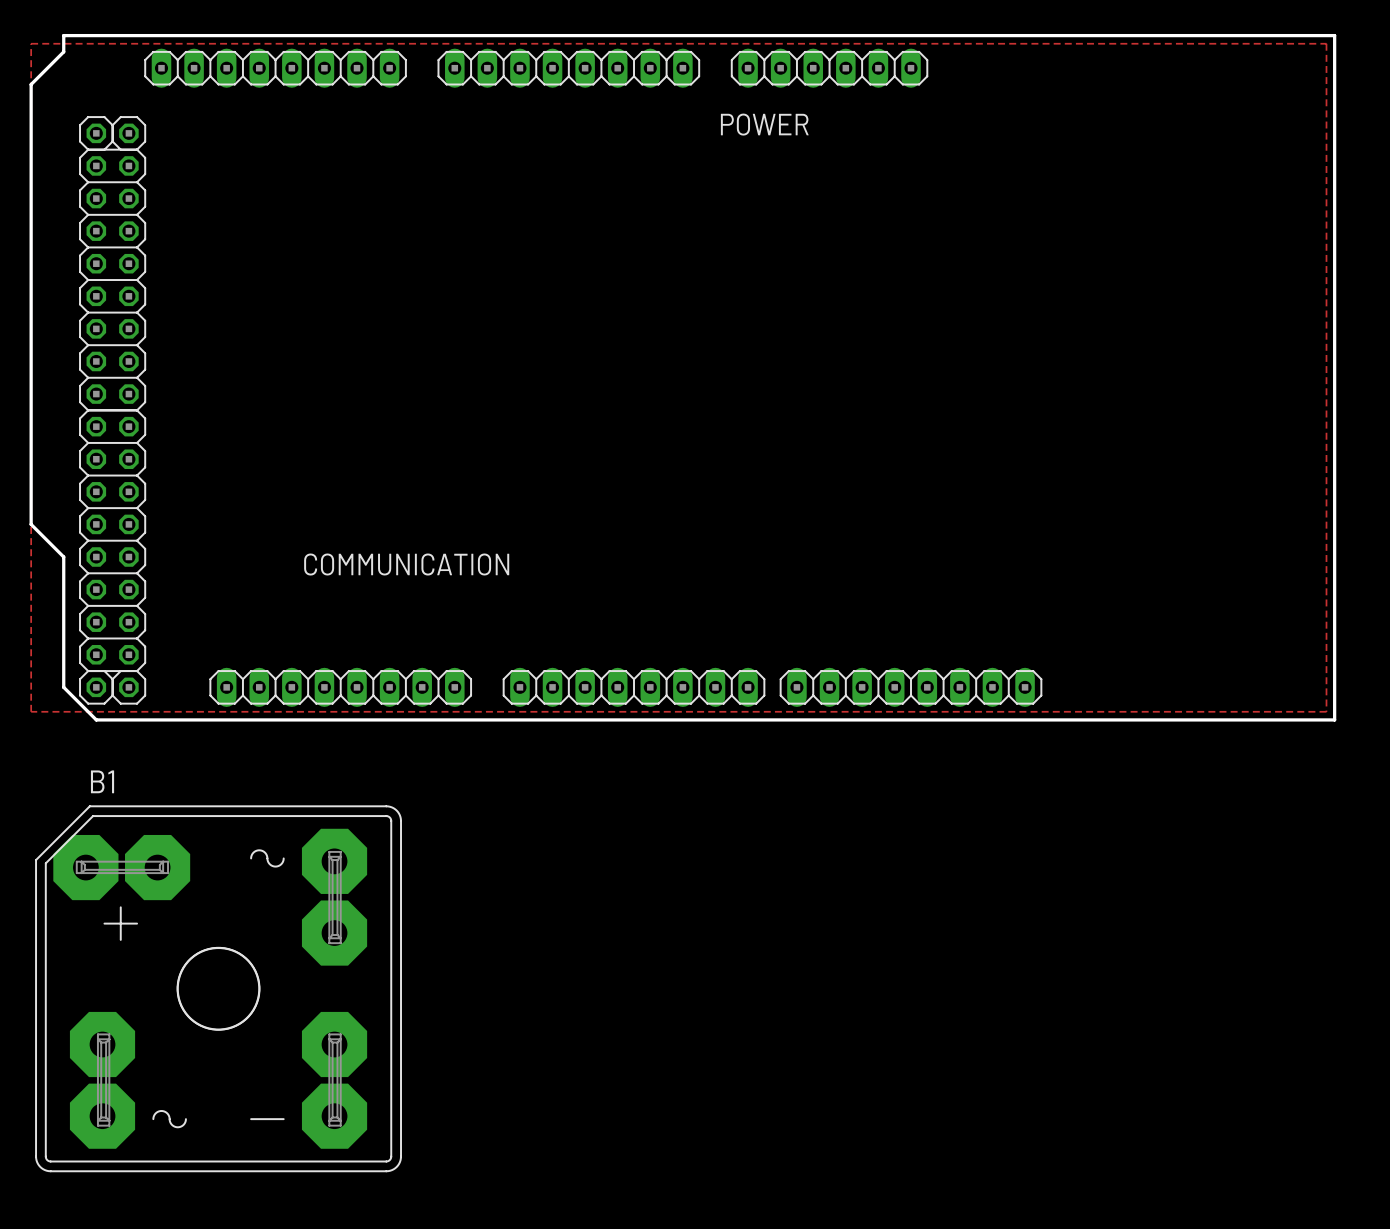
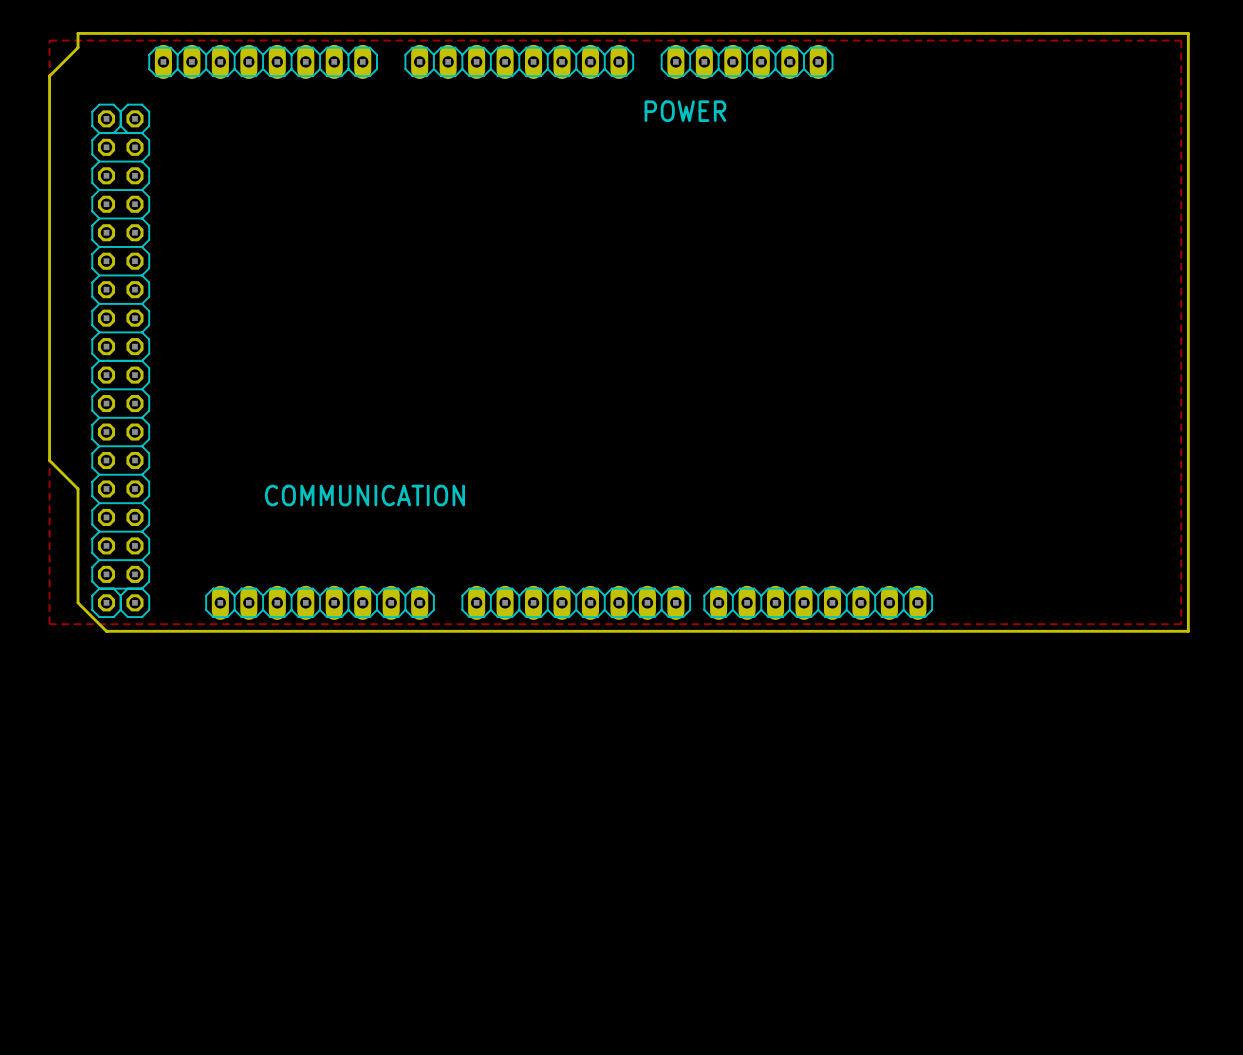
B1: (218, 988) -> none

